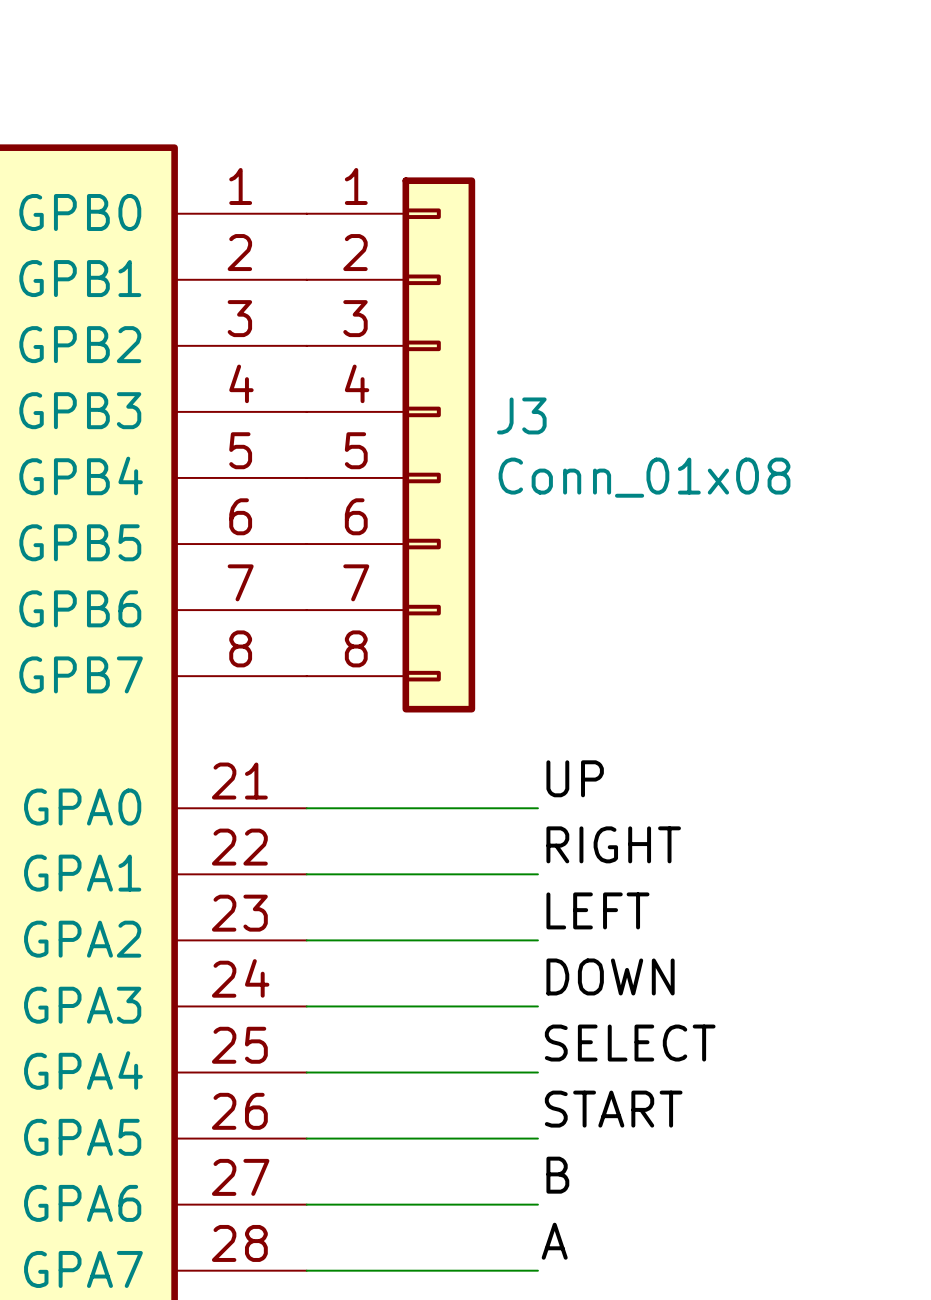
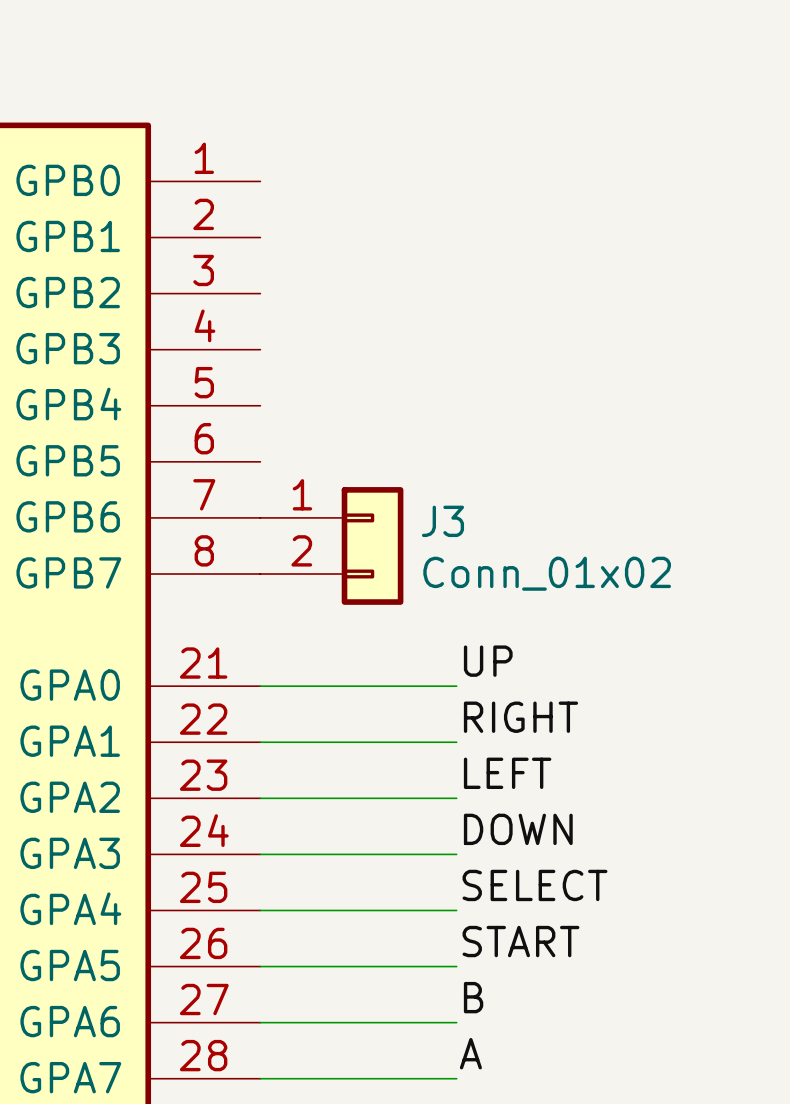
J3 symbol: [306, 177, 476, 713] -> [260, 487, 404, 605]
J3 value: Conn_01x08 (644, 477) -> Conn_01x02 (547, 573)

